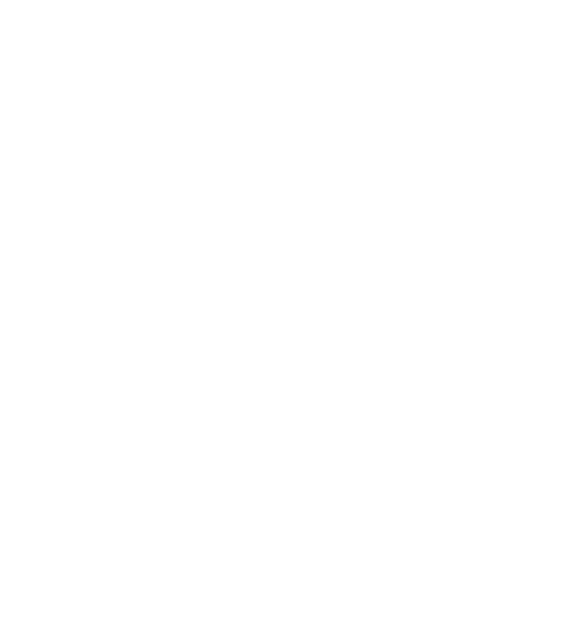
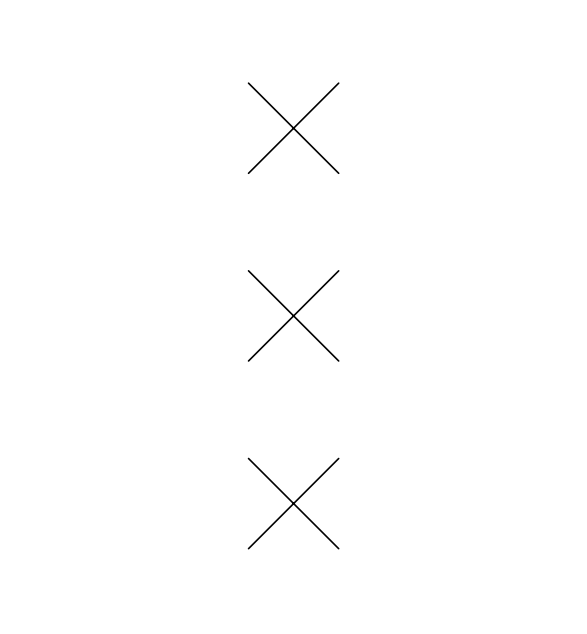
no-connect mark: none -> (293, 128)
no-connect mark: none -> (293, 315)
no-connect mark: none -> (293, 503)

